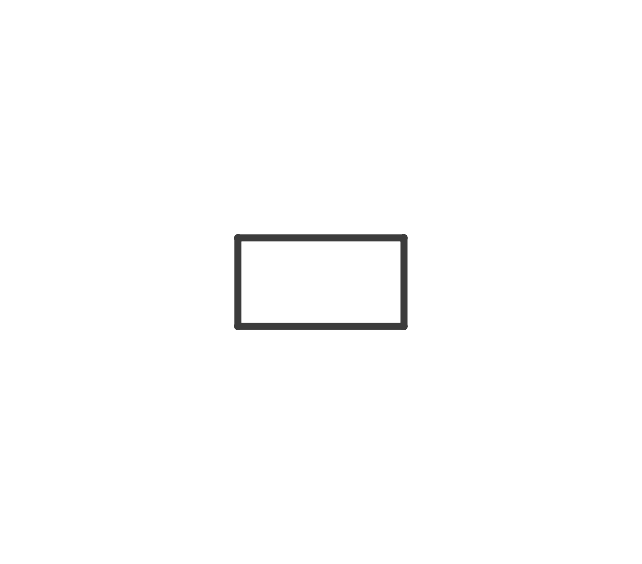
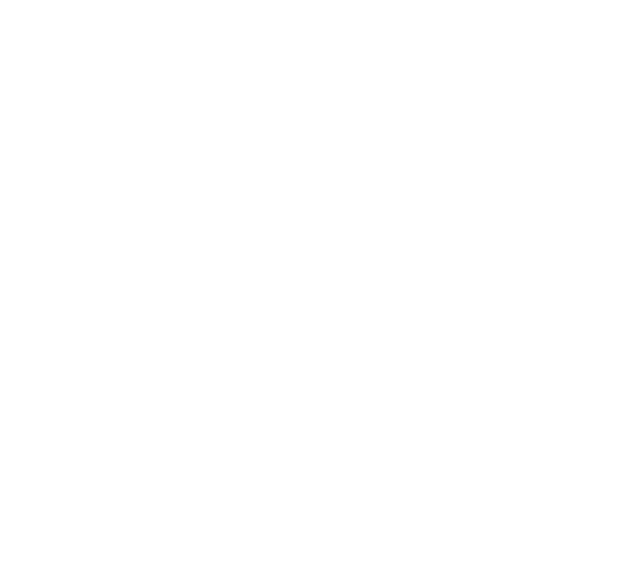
part: (320, 282) -> none

